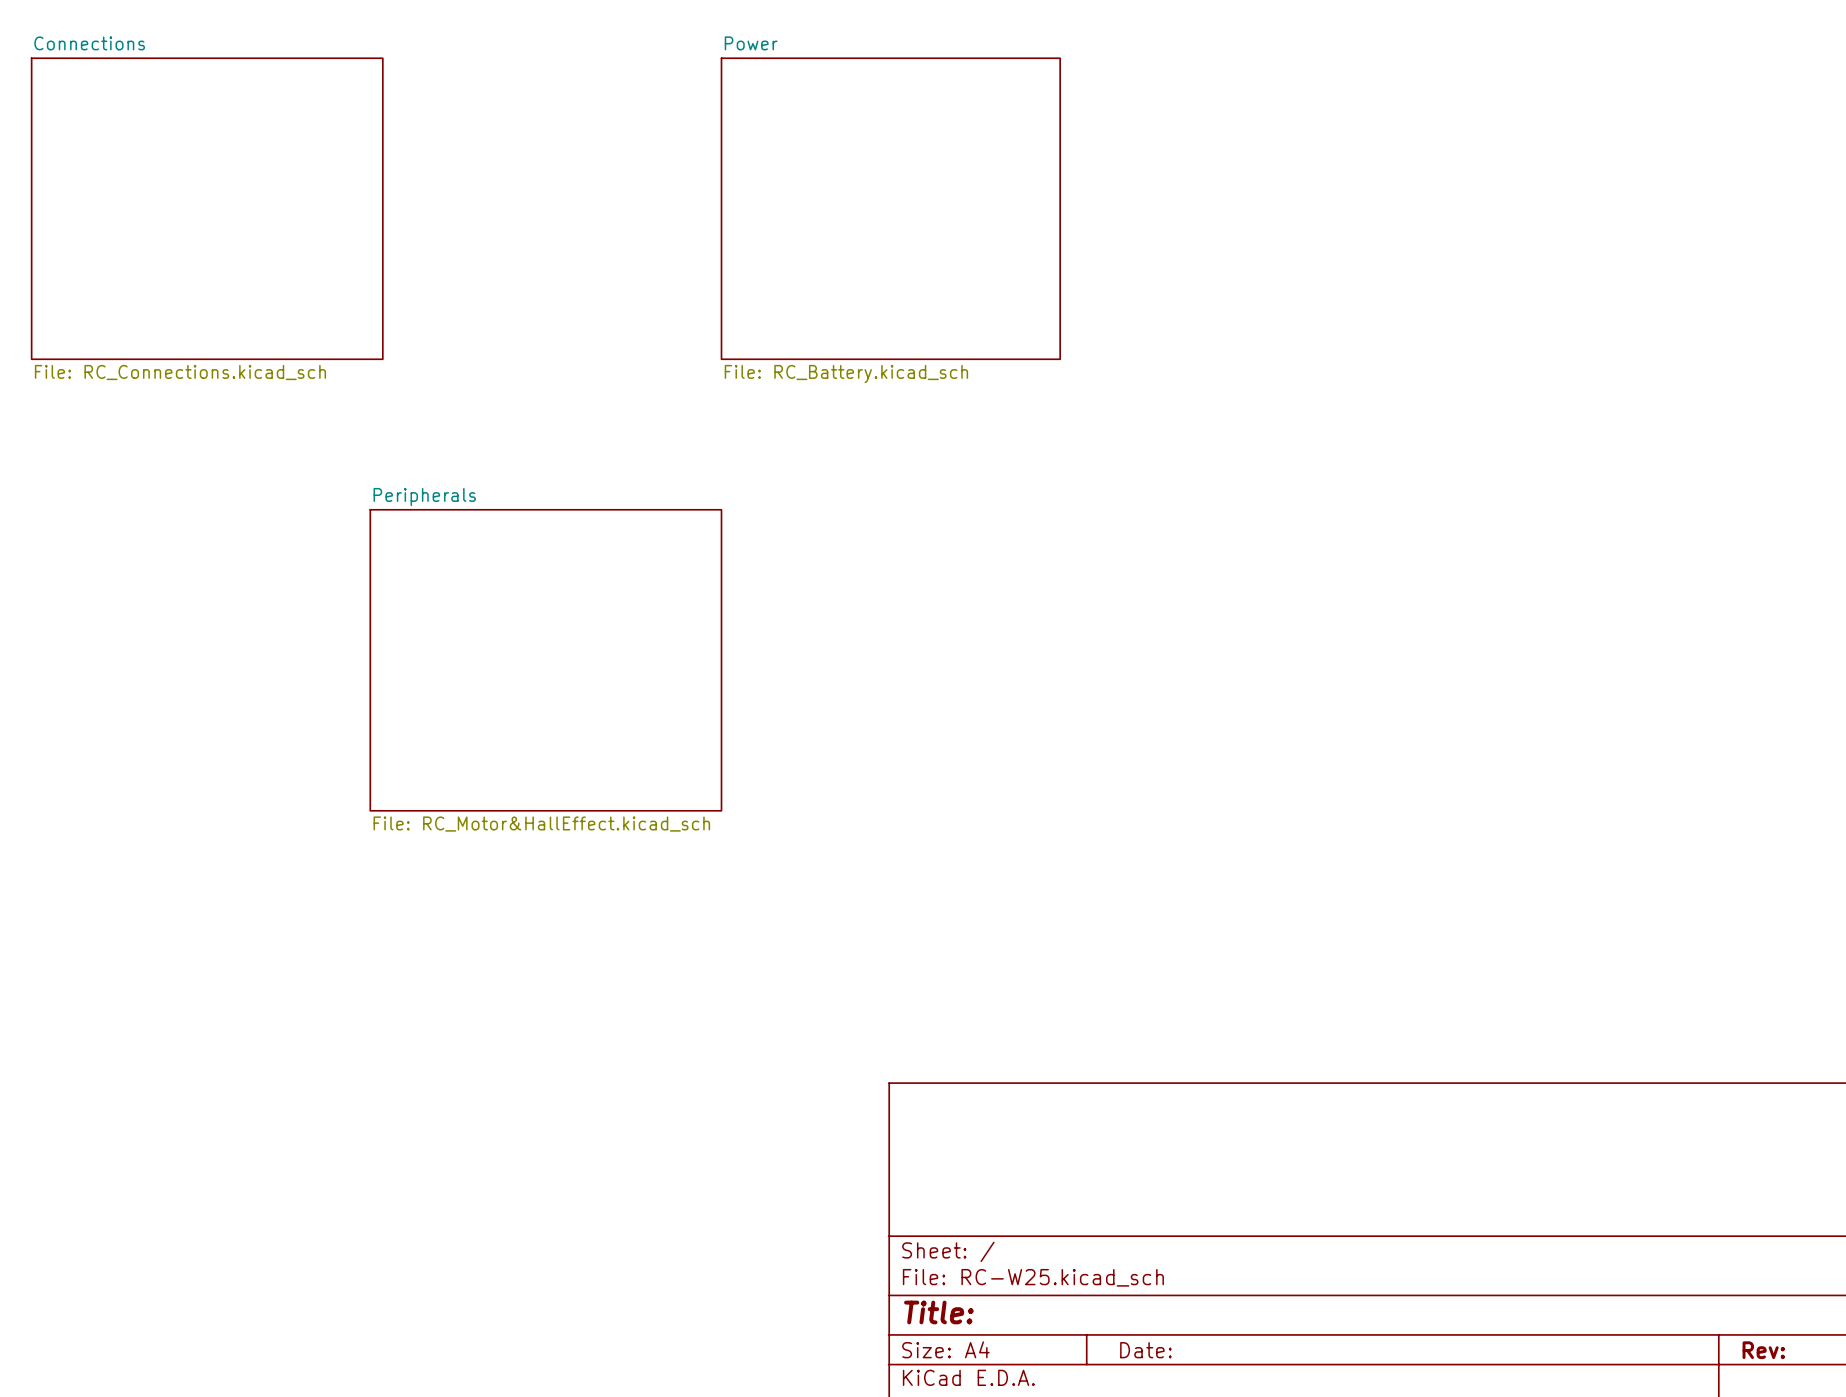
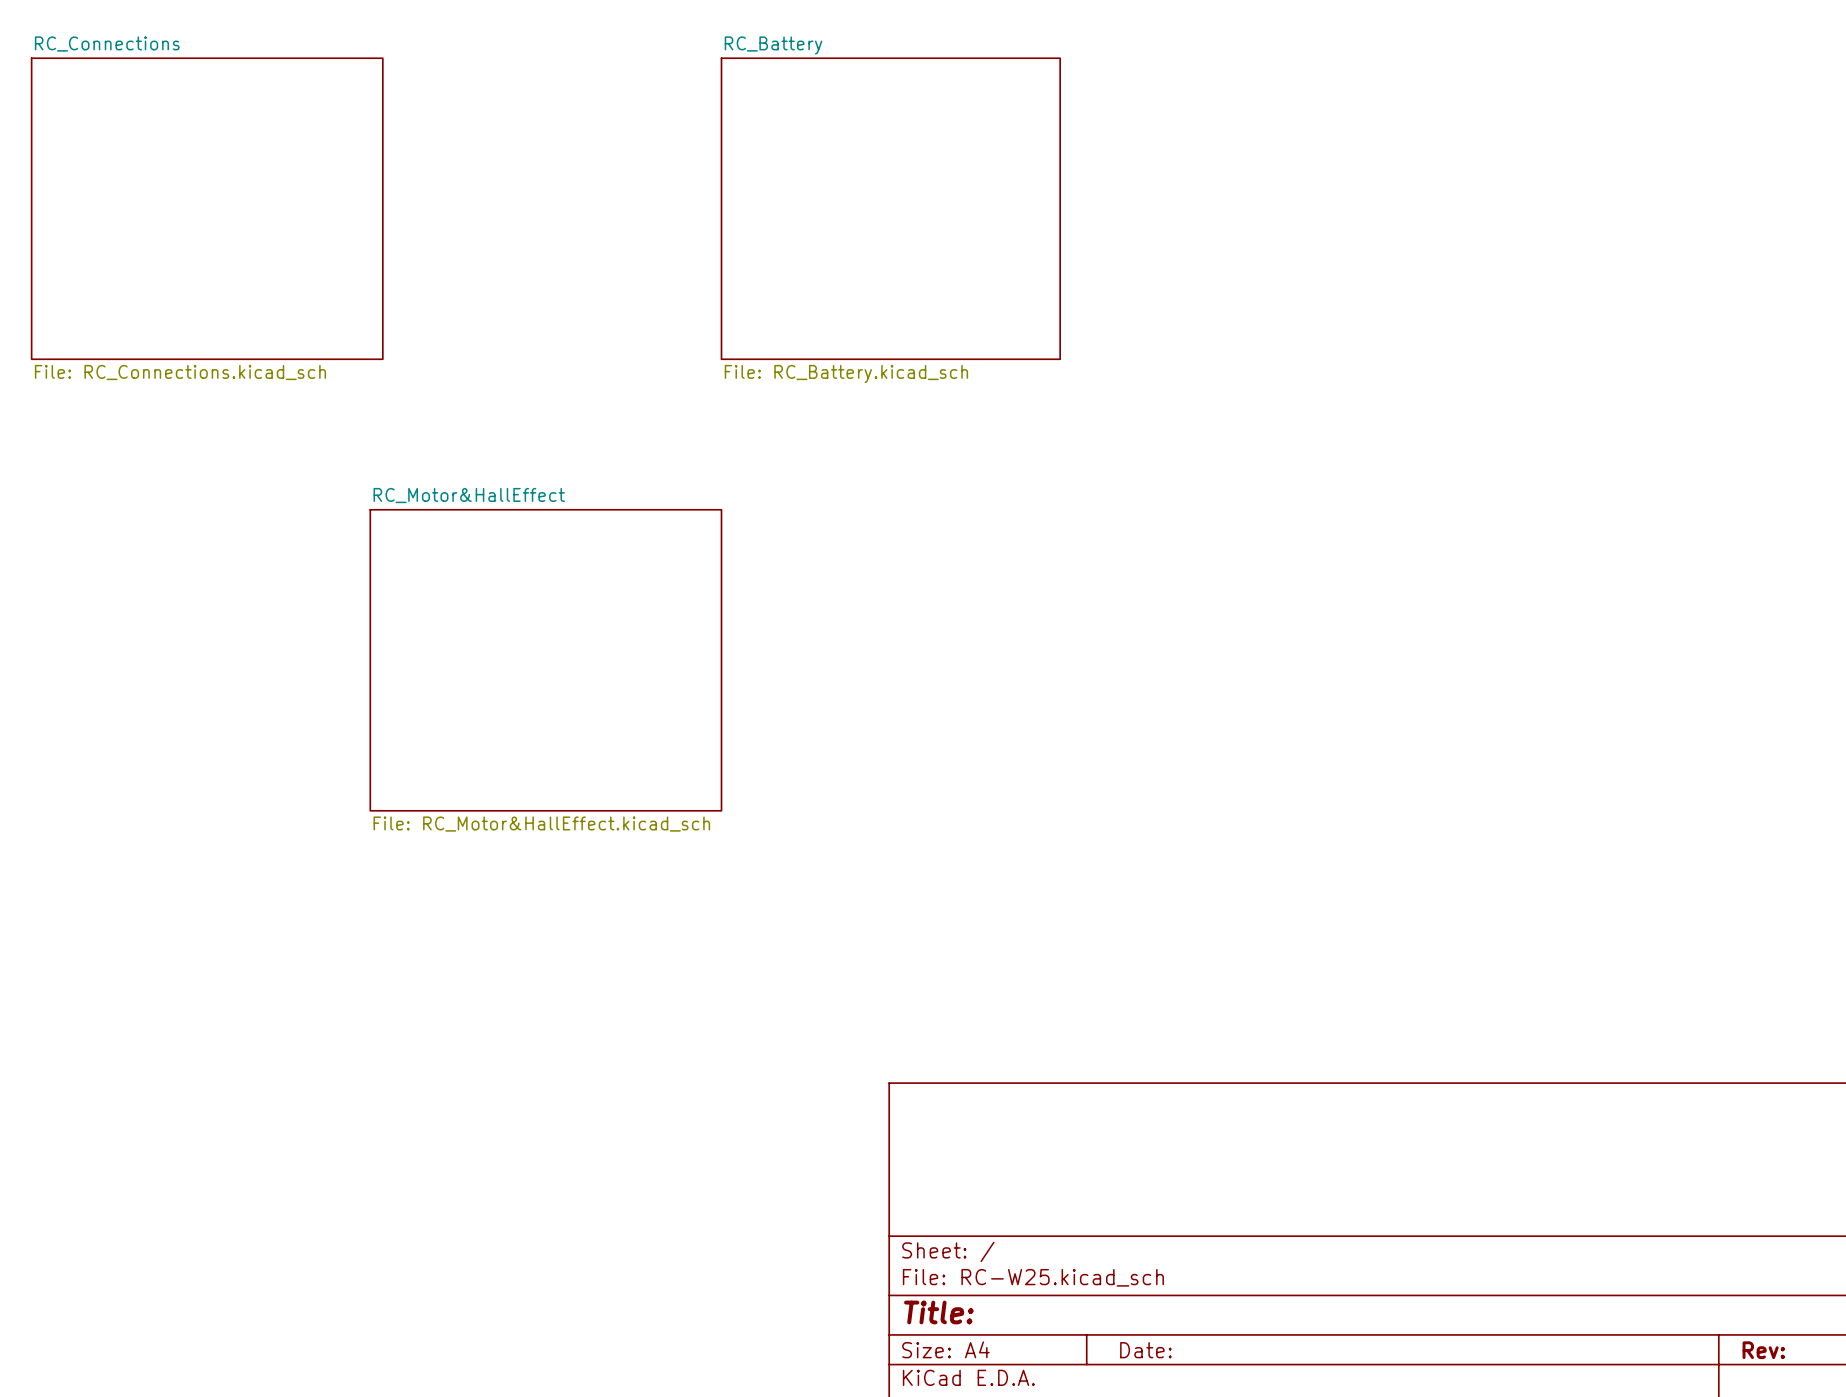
sheet Connections name: Connections (89, 43) -> RC_Connections (107, 43)
sheet Power name: Power (751, 43) -> RC_Battery (773, 45)
sheet Peripherals name: Peripherals (424, 497) -> RC_Motor&HallEffect (469, 495)

